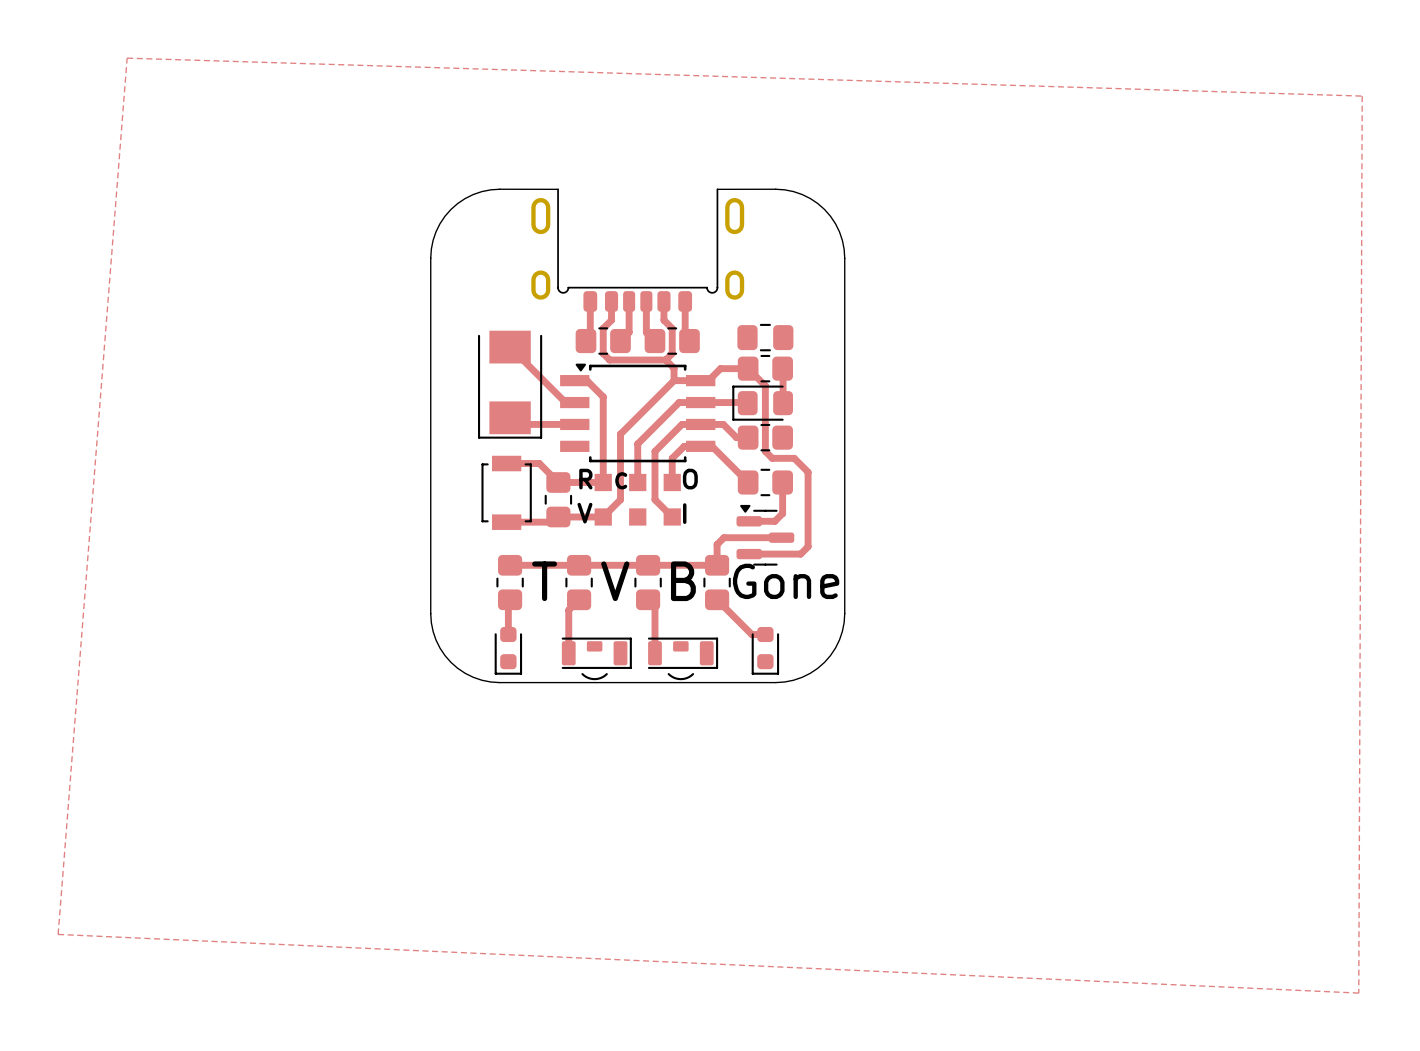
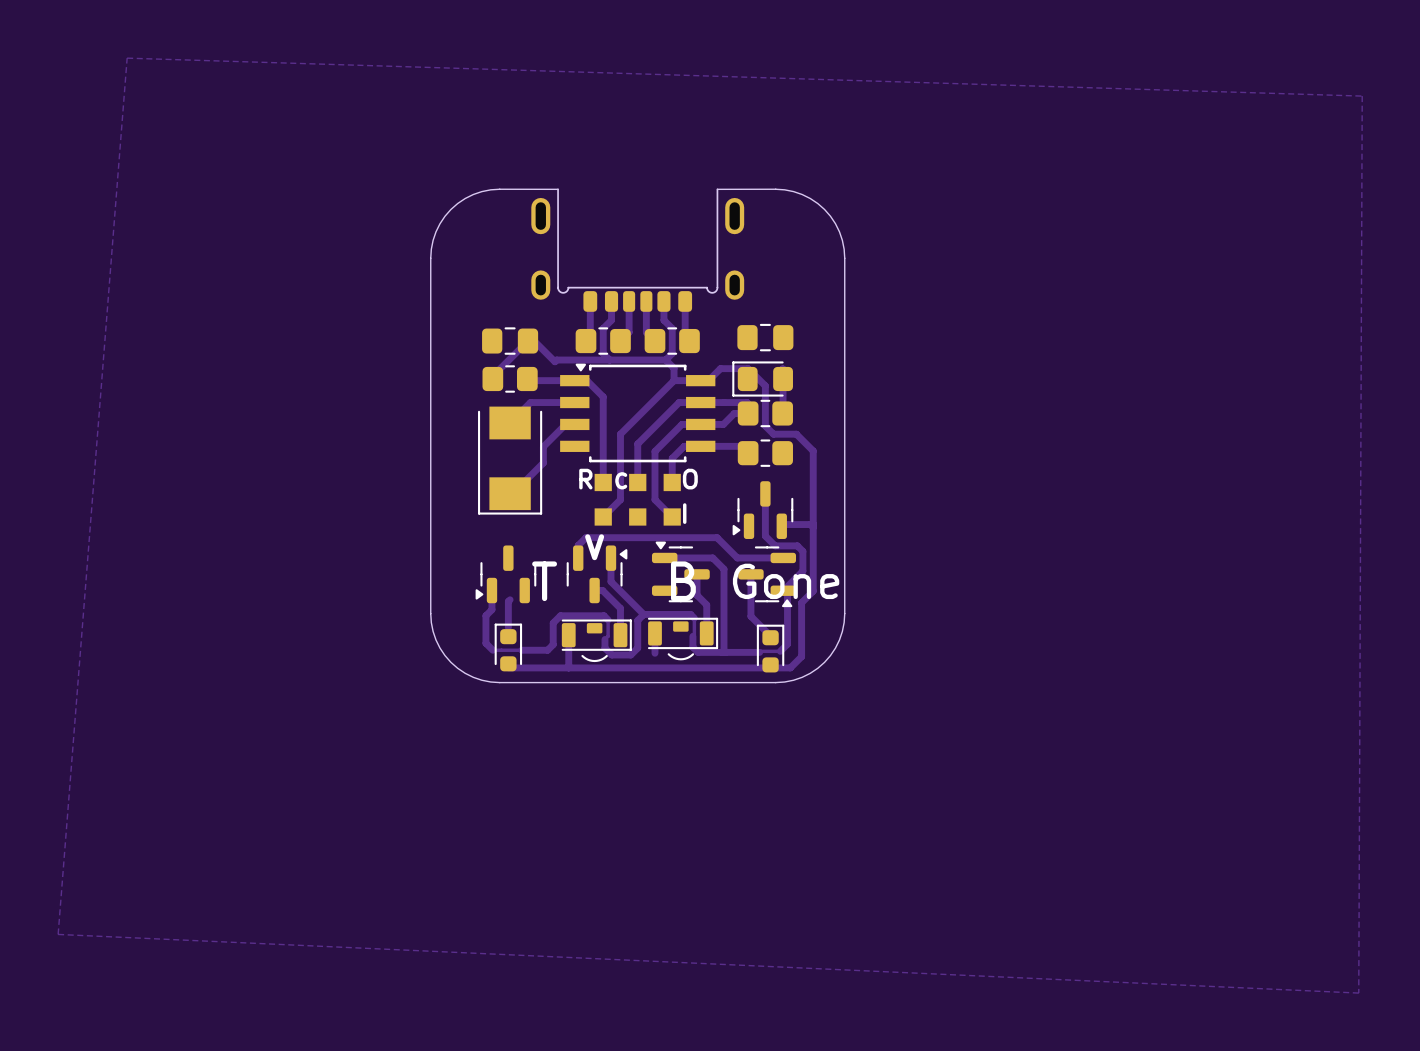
part footprint: [478, 330, 543, 439] -> [482, 365, 538, 393]
part: none -> (510, 341)
track: (510, 347) (565, 402) -> (510, 422) (530, 402) (565, 402)
part footprint: [737, 354, 793, 383] -> [732, 361, 793, 397]
track: none -> (609, 360) (556, 360) (554, 361) (534, 341) (527, 341) (492, 376) (492, 378)
track: none -> (527, 378) (528, 380) (574, 380)
part footprint: [732, 385, 793, 421] -> [737, 399, 793, 428]
track: (510, 417) (516, 424) (565, 424) -> (510, 493) (512, 493) (543, 463) (543, 446) (565, 424)
track: (723, 424) (736, 437) (748, 437) -> (723, 424) (734, 413) (748, 413)
track: (765, 426) (765, 451) (772, 458) (794, 458) (808, 472) (808, 546) (800, 554) (749, 554) -> (765, 426) (773, 434) (796, 434) (813, 451) (813, 591) (801, 602) (801, 656) (790, 667) (508, 667)
part: (765, 437) -> none
track: (712, 446) (748, 482) -> (712, 446) (741, 446) (748, 453)
part: none -> (765, 453)
part: none -> (510, 460)
track: (506, 463) (539, 463) (558, 482) (603, 482) -> none
part: (765, 482) -> none
track: (782, 482) (782, 513) (774, 521) (749, 521) -> none
part: (506, 492) -> none
track: none -> (765, 492) (765, 536) (775, 545) (797, 545) (802, 551) (802, 571) (783, 590) (787, 594) (787, 644) (780, 651) (698, 652) (692, 647) (694, 618) (690, 614) (643, 614)
part: (558, 499) -> none
part: none -> (762, 510)
text: V (584, 513) -> none
track: (603, 516) (558, 516) (553, 522) (506, 522) -> none
track: none -> (781, 524) (810, 524) (813, 527)
part: (765, 535) -> none
track: (781, 537) (723, 537) (717, 544) (717, 565) -> none
text: none -> V (594, 547)
part footprint: [496, 554, 524, 611] -> [475, 545, 537, 604]
track: none -> (664, 557) (712, 557) (723, 569) (723, 650) (725, 652)
track: none -> (783, 557) (737, 557) (717, 537) (585, 537) (578, 545) (578, 558)
track: none -> (611, 558) (611, 581) (643, 614)
track: (510, 565) (723, 565) -> none
part: none -> (680, 571)
part: none -> (597, 574)
track: none -> (697, 574) (697, 595) (706, 604) (706, 637)
track: none -> (750, 574) (750, 616) (767, 632)
part: none -> (767, 576)
text: V (615, 581) -> none
part: (579, 582) -> none
part: (648, 582) -> none
part: (717, 582) -> none
track: none -> (491, 590) (491, 609) (485, 615) (485, 643) (492, 650) (547, 650) (553, 644) (553, 623) (560, 615) (603, 615) (608, 619) (608, 636) (604, 639) (604, 648) (611, 654) (630, 654) (637, 648) (637, 620) (643, 614)
track: none -> (594, 590) (602, 590) (620, 608) (620, 635)
track: (579, 599) (568, 610) (568, 648) -> none
track: (648, 599) (654, 606) (654, 646) -> none
track: (717, 599) (751, 634) (765, 634) -> none
part rotation: 0° (508, 650) -> 180° (508, 647)
part rotation: 0° (765, 650) -> 180° (770, 648)
track: none -> (568, 653) (568, 667)
part position: (596, 658) -> (596, 640)
part position: (683, 658) -> (683, 639)

